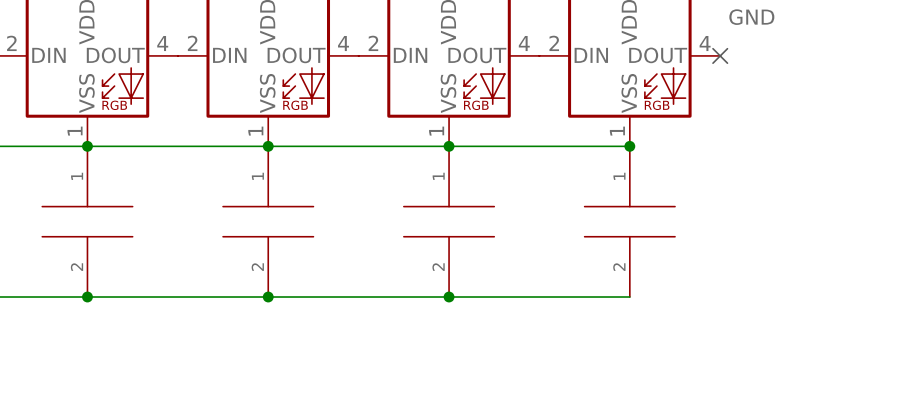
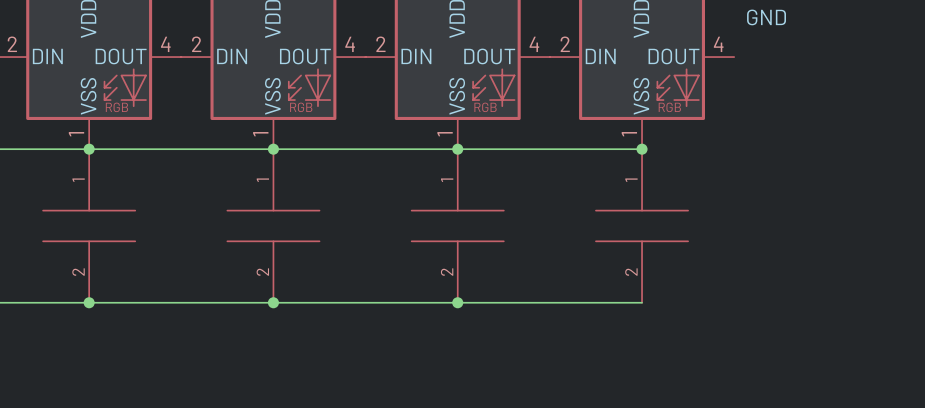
no-connect mark: (720, 55) -> none

